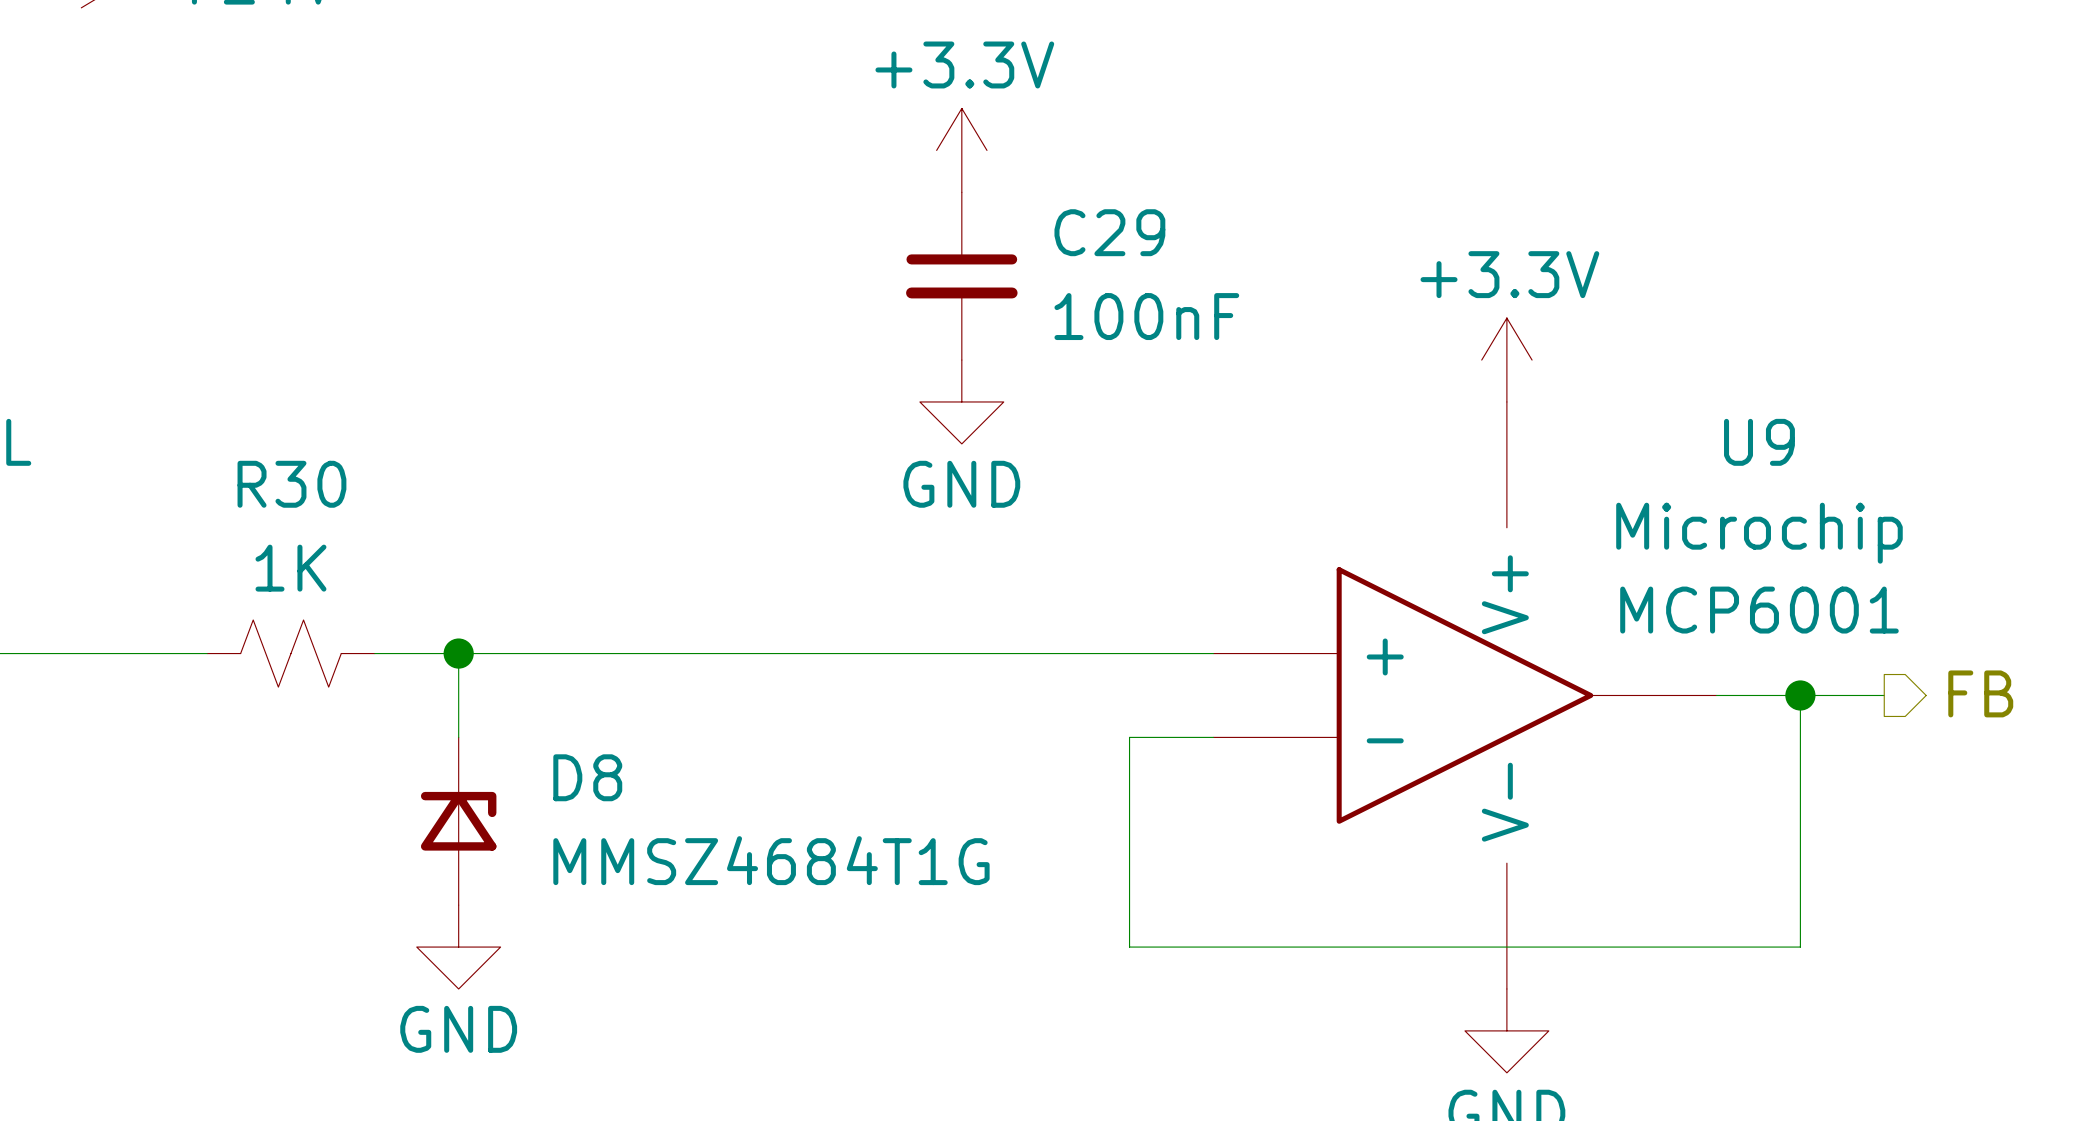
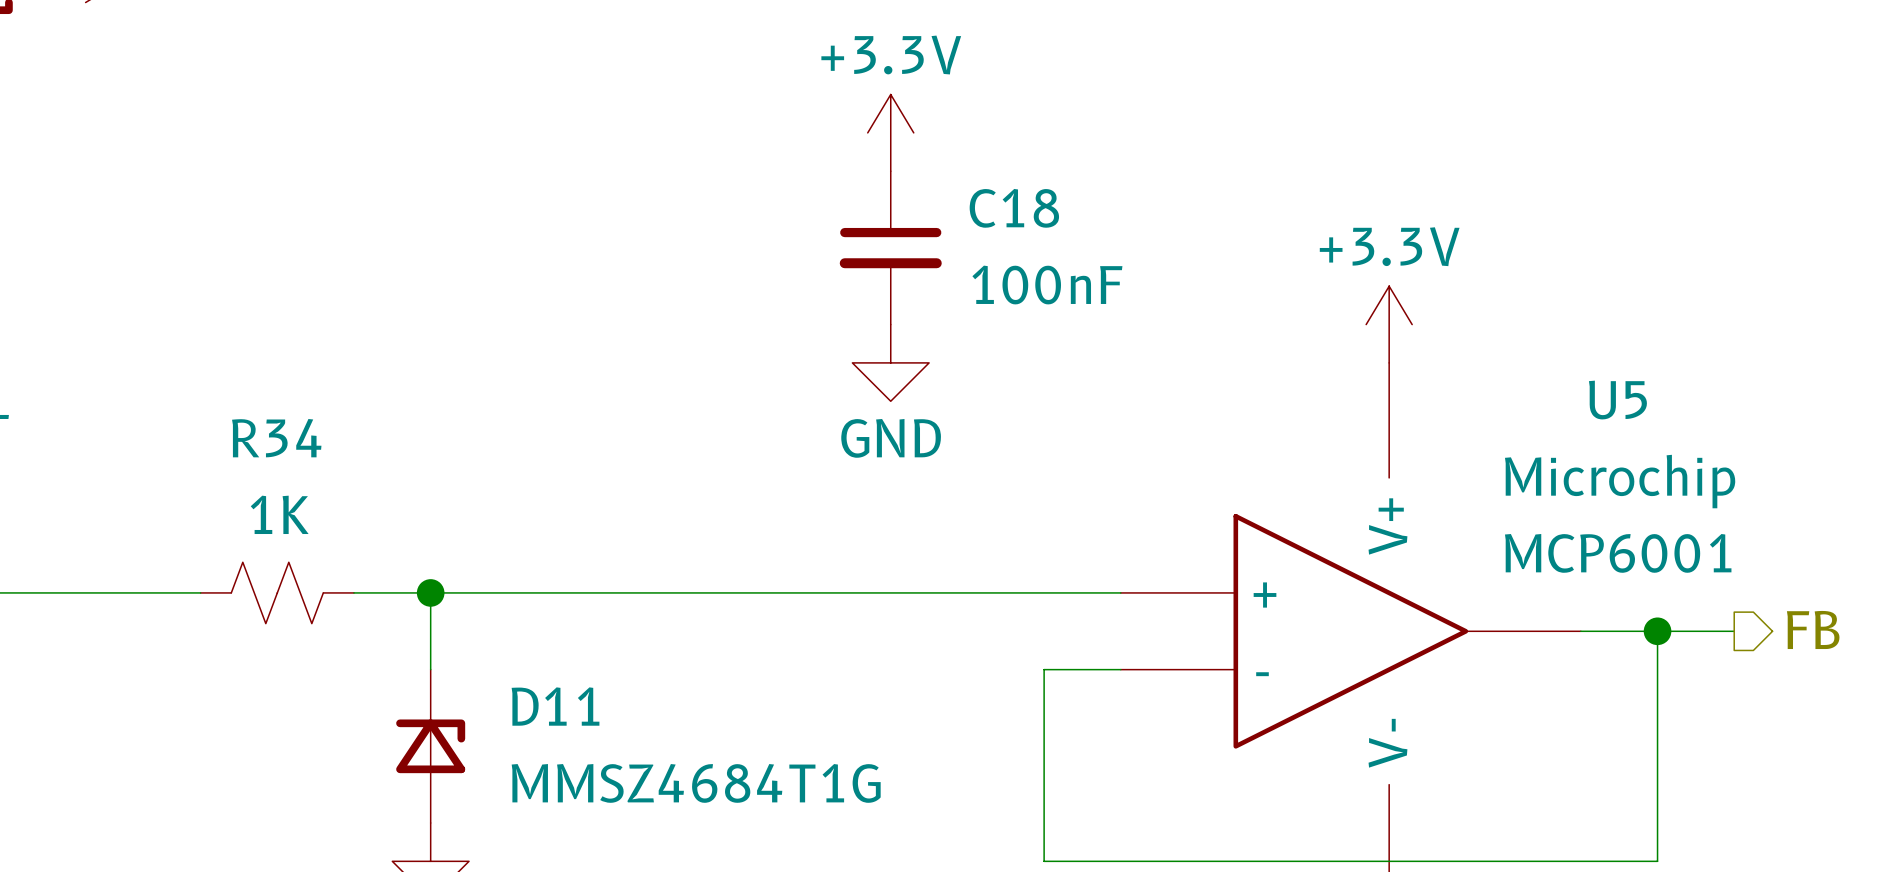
C29 name: C29 (1109, 232) -> C18 (1014, 208)
U9 name: U9 (1759, 442) -> U5 (1617, 400)
R30 name: R30 (291, 484) -> R34 (276, 438)
D8 name: D8 (587, 777) -> D11 (555, 706)

